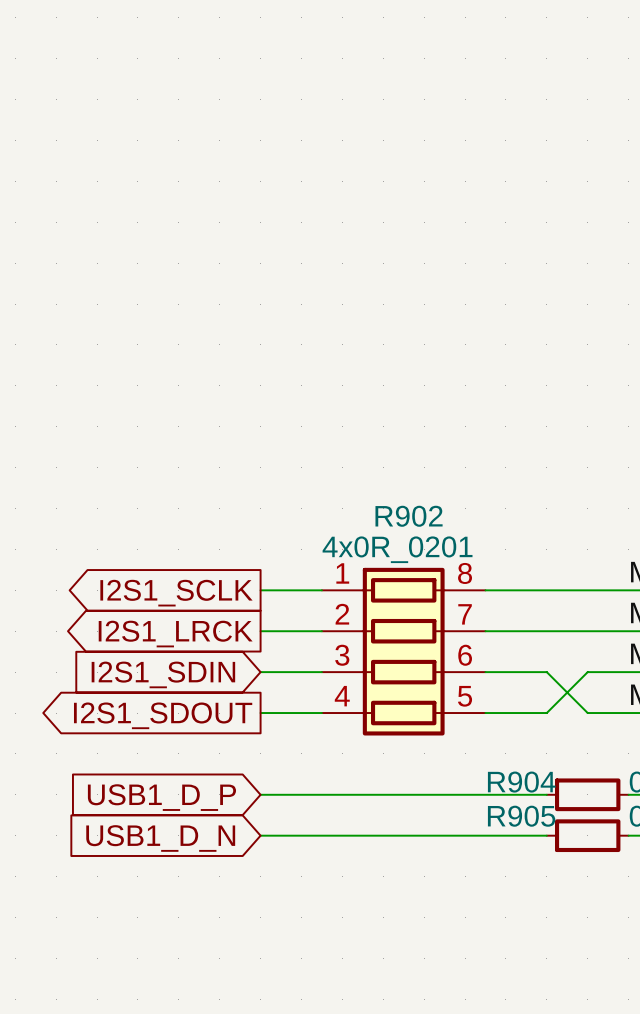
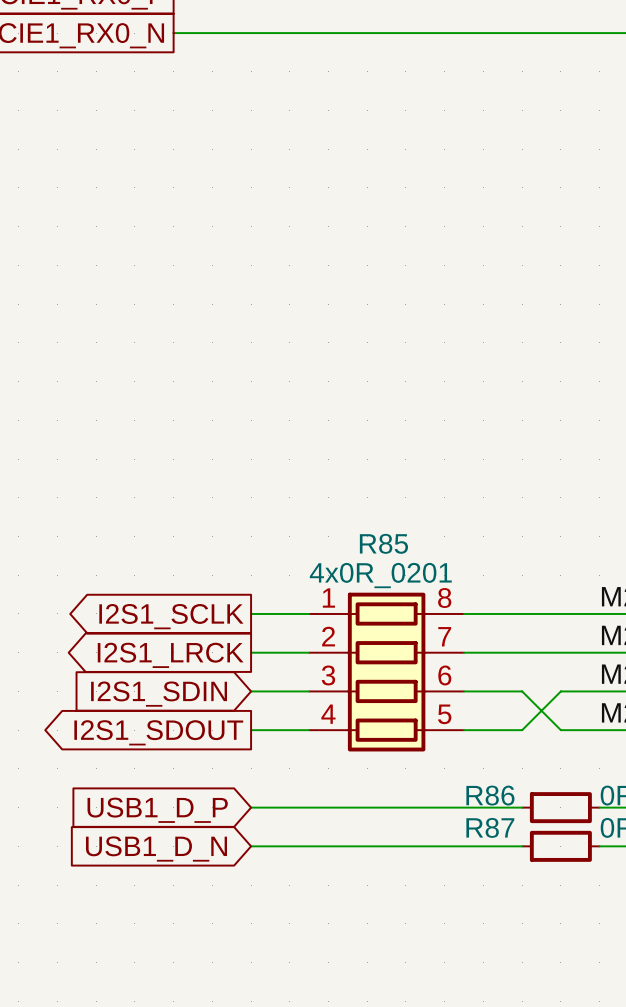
R902 name: R902 (409, 516) -> R85 (383, 543)
R904 name: R904 (521, 782) -> R86 (490, 795)
R905 name: R905 (521, 816) -> R87 (490, 827)

